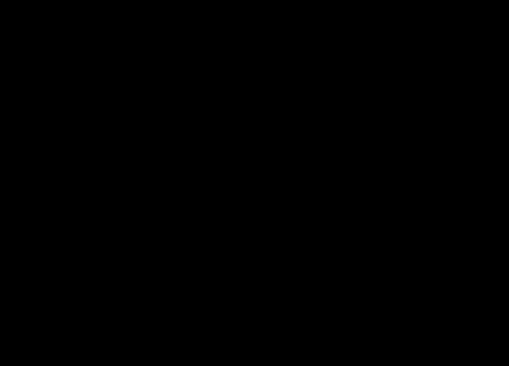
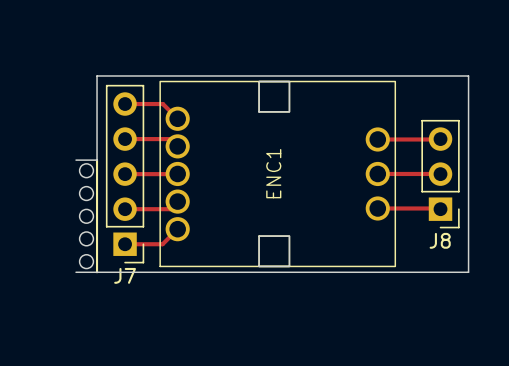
track: none -> (125, 104) (162, 104) (177, 118)
track: none -> (125, 139) (170, 139) (177, 146)
track: none -> (440, 139) (377, 139)
board edge: none -> (75, 160) (97, 160) (97, 75) (468, 75) (468, 272) (75, 272)
line: none -> (97, 160) (97, 272)
round board edge: none -> [78, 163, 95, 179]
ENC1: none -> (277, 173)
track: none -> (377, 173) (440, 173)
track: none -> (125, 174) (177, 174)
J7: none -> (125, 174)
J8: none -> (440, 174)
round board edge: none -> [78, 185, 95, 202]
track: none -> (177, 201) (170, 209) (125, 209)
round board edge: none -> [78, 208, 95, 224]
track: none -> (377, 208) (439, 208)
track: none -> (177, 229) (162, 244) (125, 244)
round board edge: none -> [78, 231, 95, 247]
round board edge: none -> [78, 254, 95, 270]

